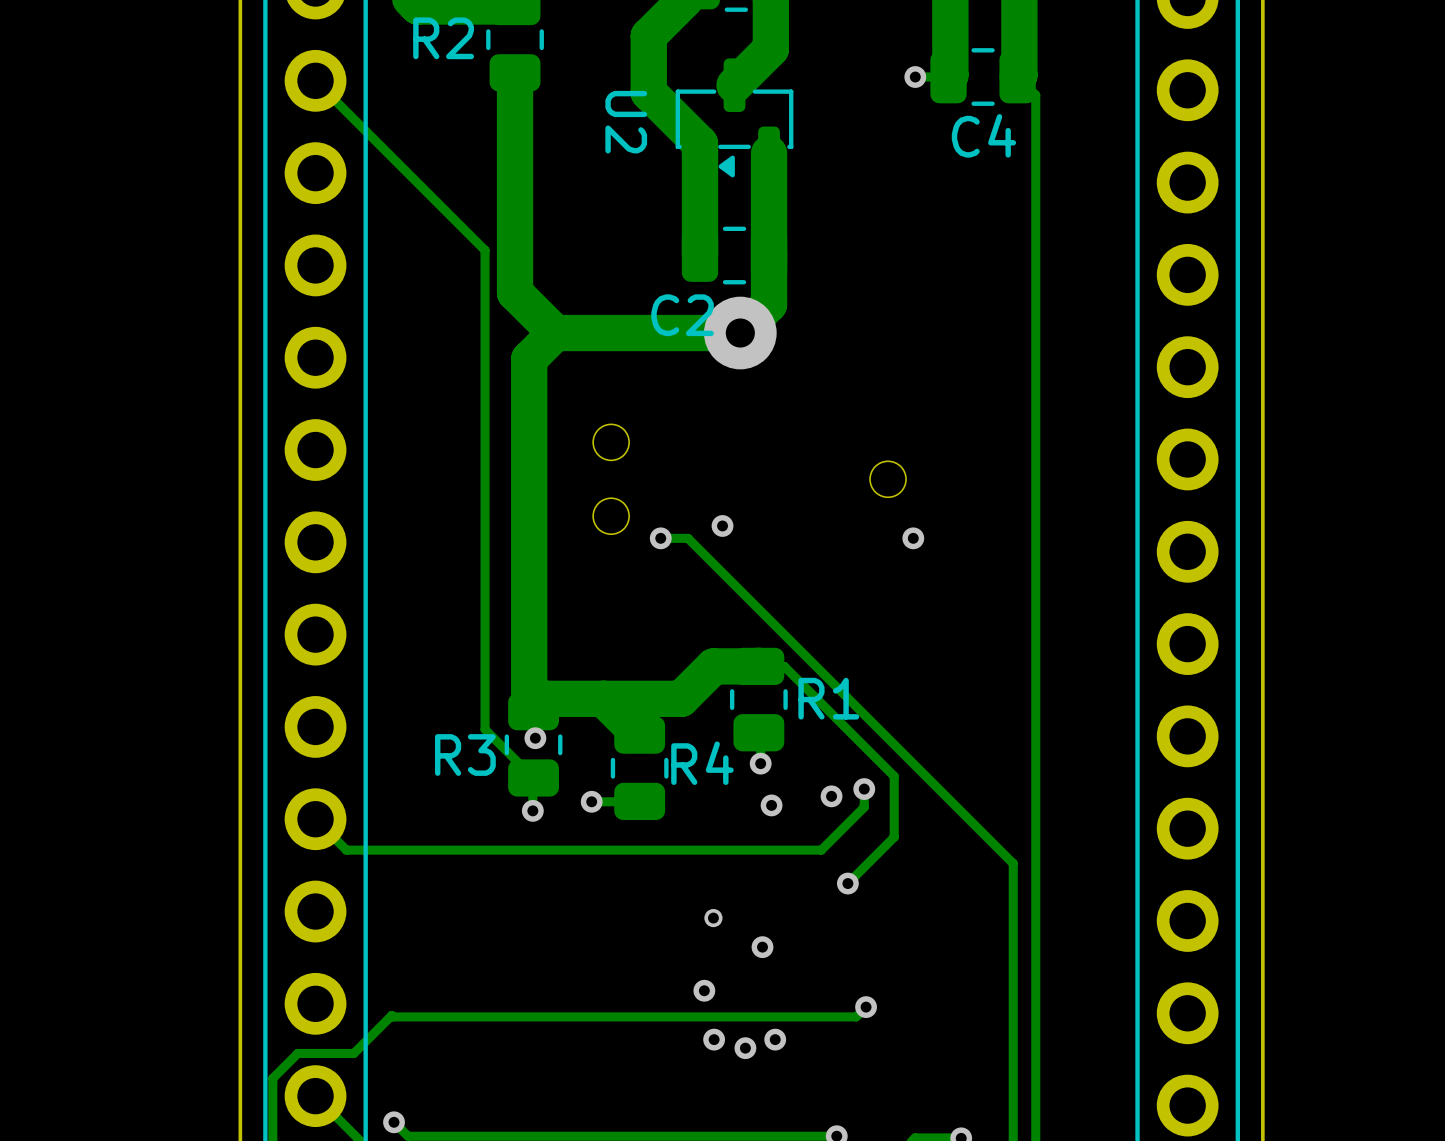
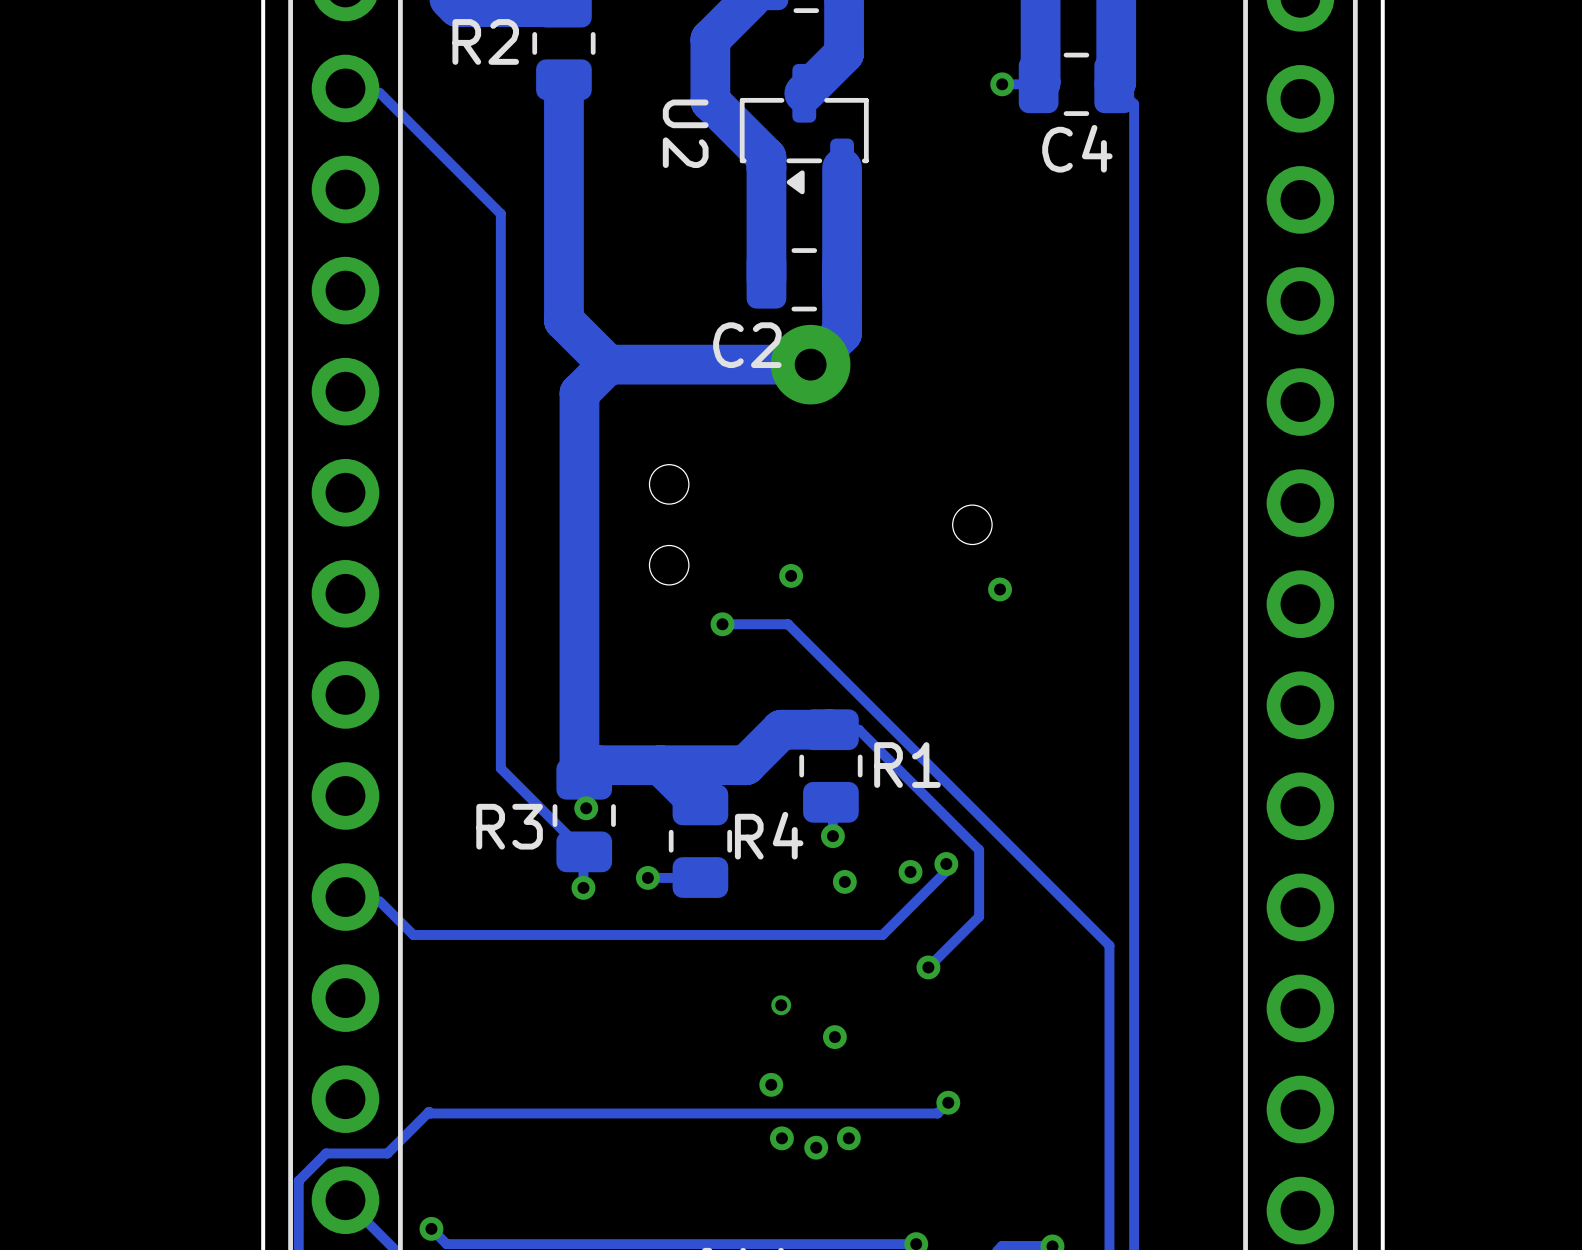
track: (315, 80) (485, 250) (485, 729) -> (379, 92) (500, 213) (500, 768) (531, 798)
track: (660, 538) (688, 538) (719, 570) -> (722, 624) (788, 624)
via position: (660, 538) -> (722, 624)
track: (864, 795) (864, 807) (821, 850) (346, 850) (315, 819) -> (946, 871) (882, 934) (413, 934) (379, 901)

